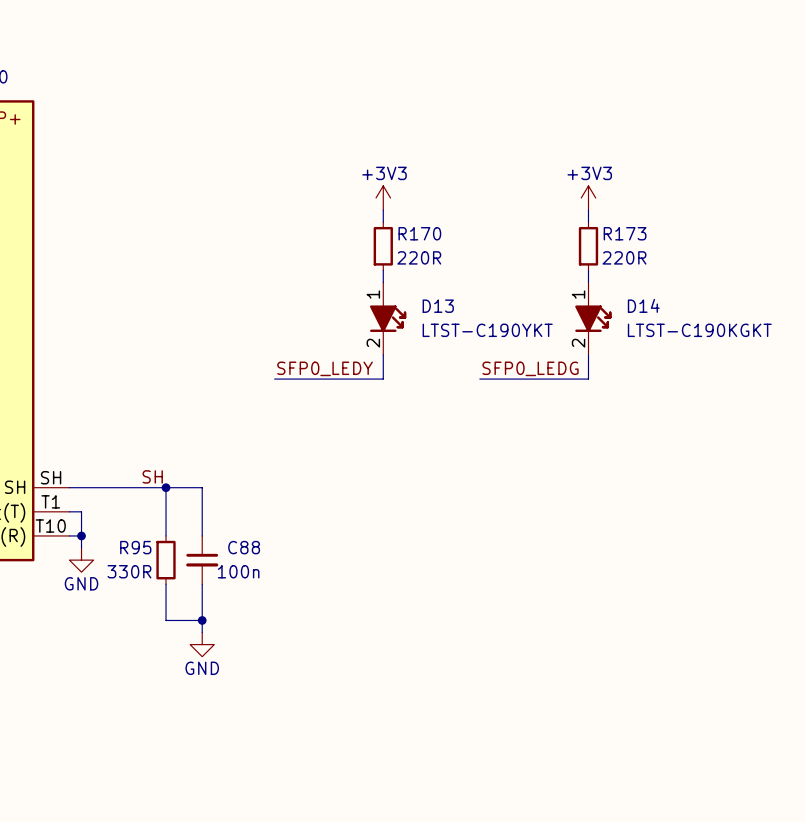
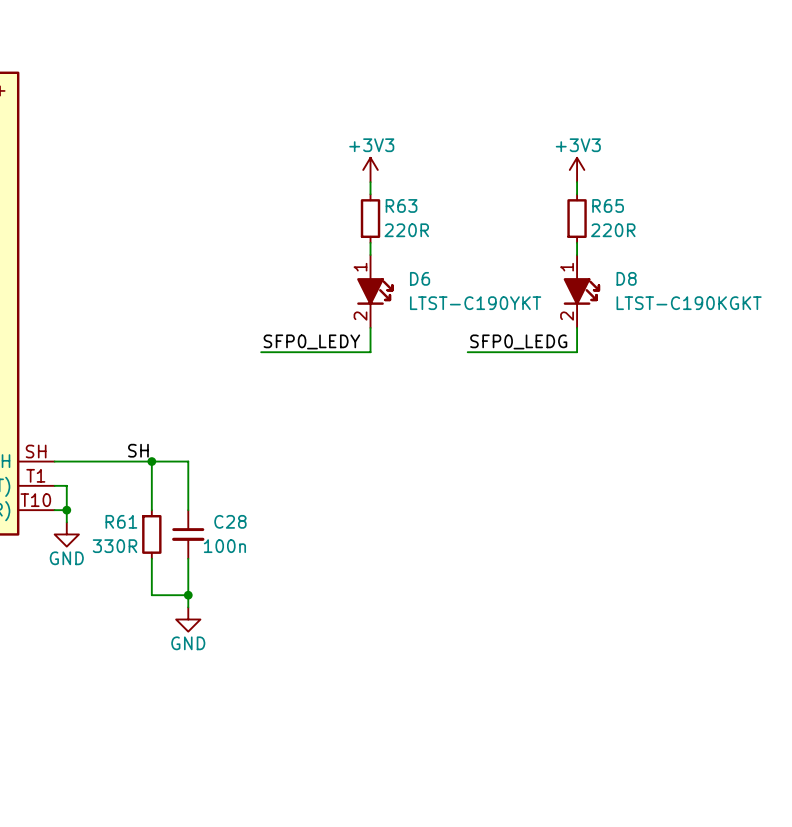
R170 name: R170 (419, 233) -> R63 (401, 205)
R173 name: R173 (625, 233) -> R65 (608, 205)
D14 name: D14 (643, 305) -> D8 (626, 278)
D13 name: D13 (438, 306) -> D6 (420, 278)
R95 name: R95 (135, 547) -> R61 (121, 521)
C88 name: C88 (244, 547) -> C28 (230, 521)

